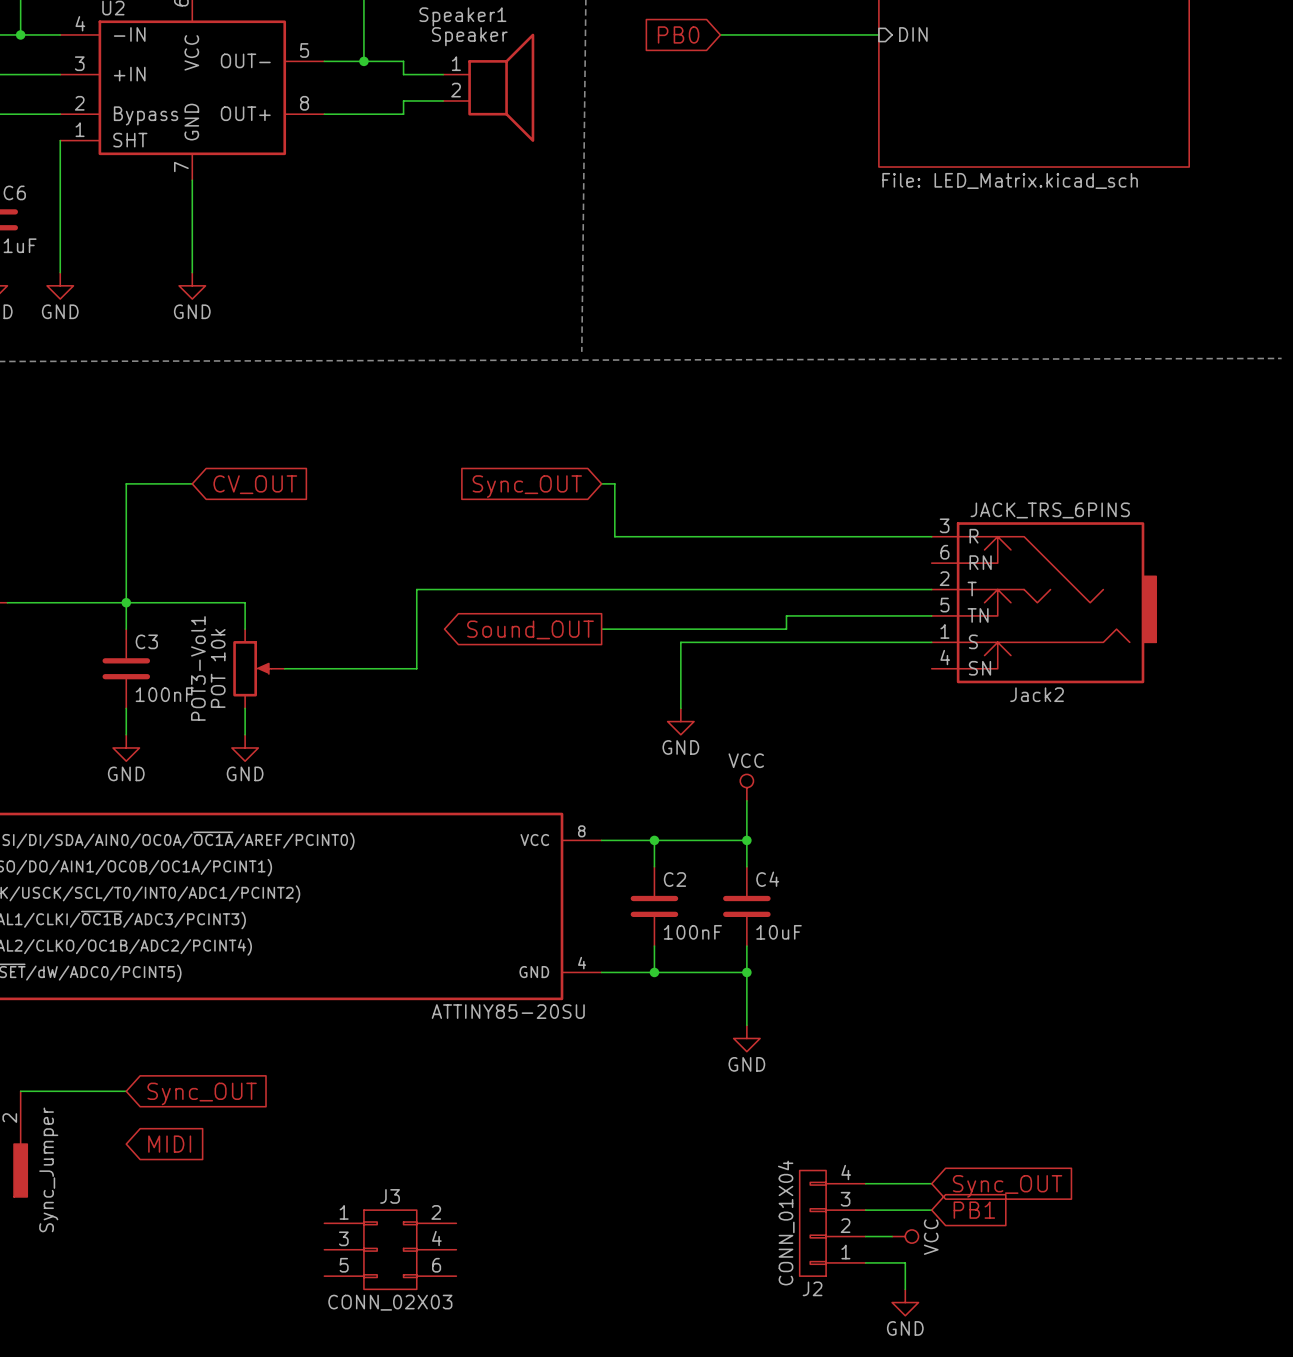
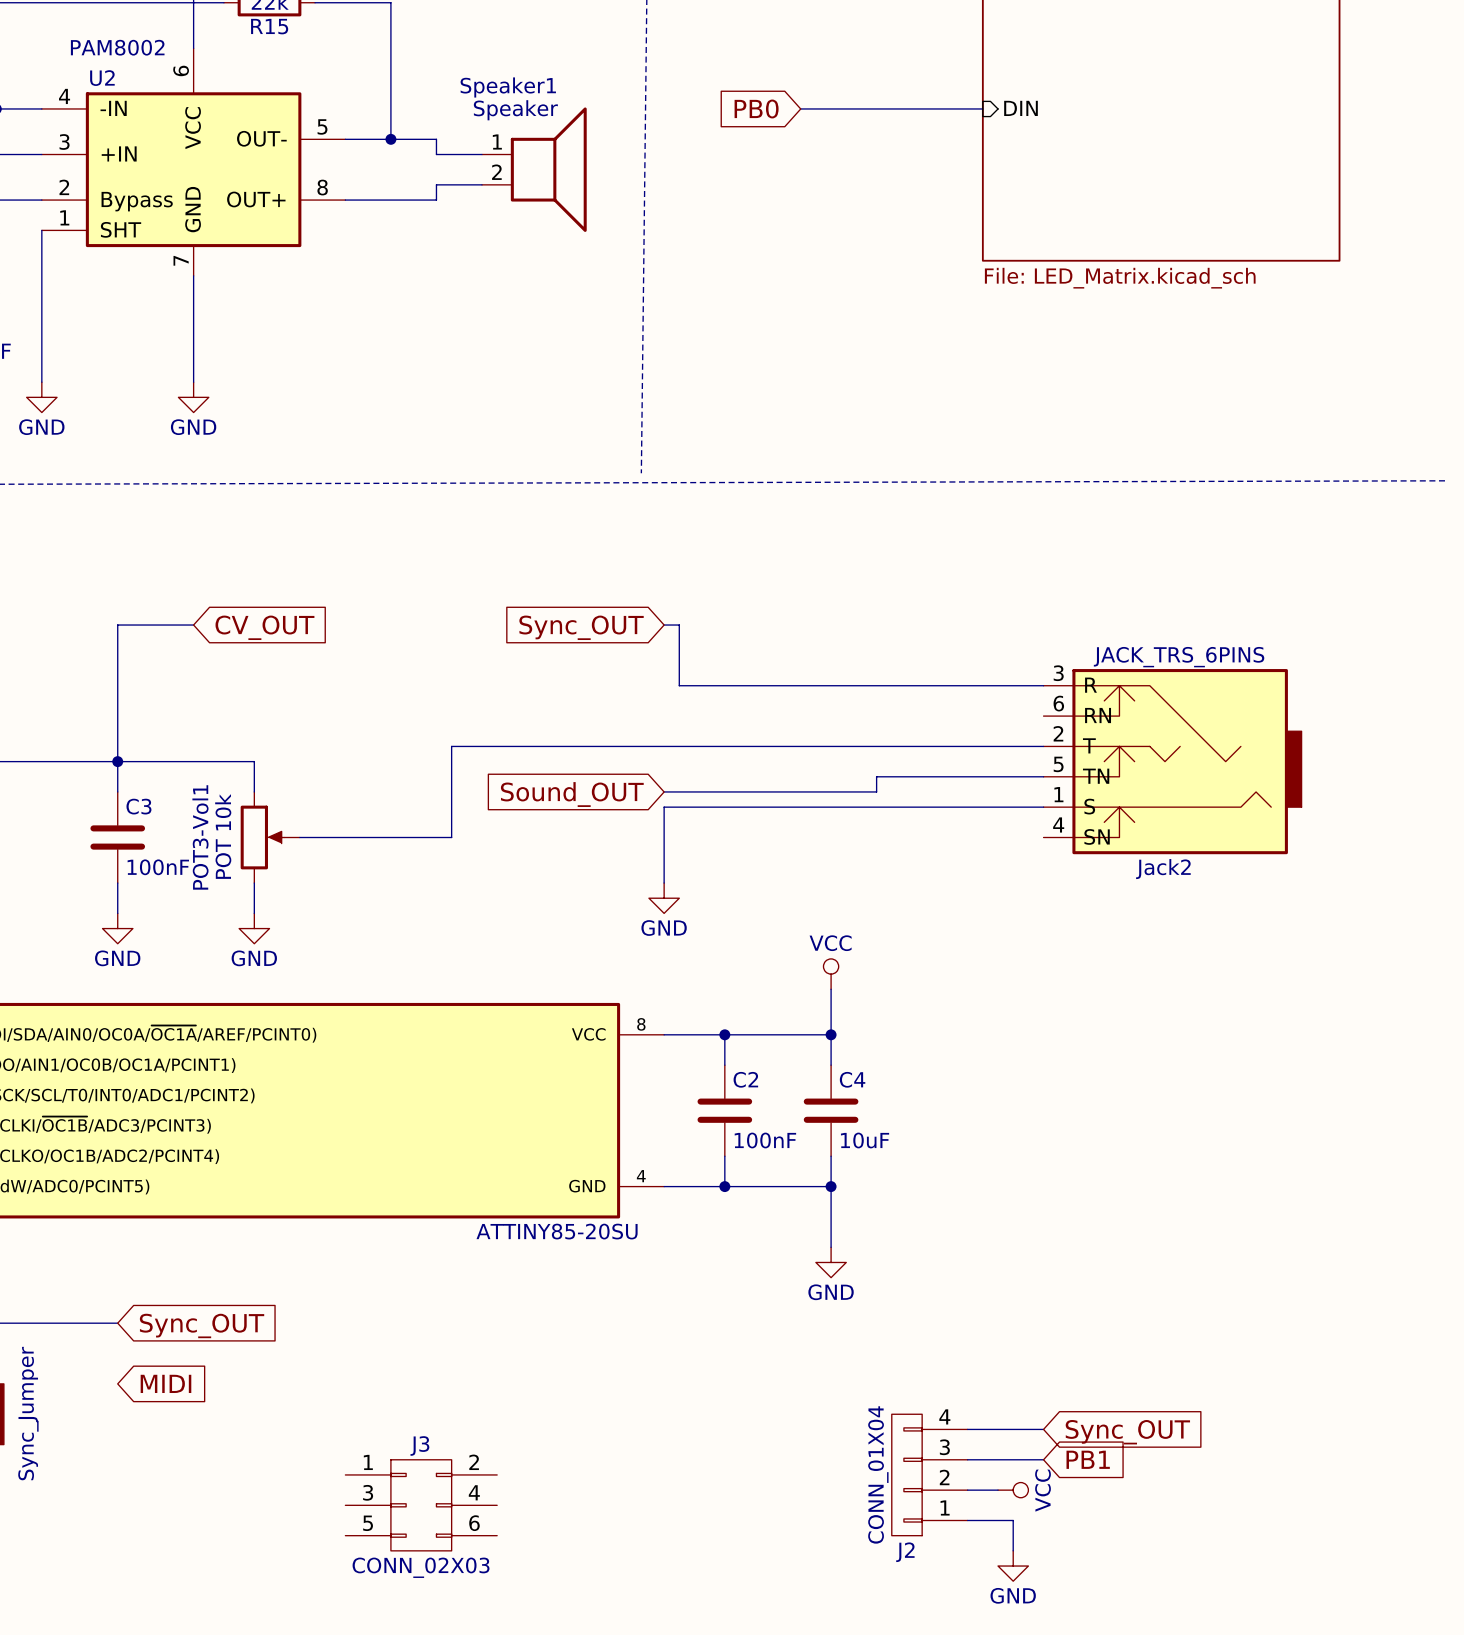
global label shape: output (530, 629) -> input (572, 794)
wire: (680, 642) (680, 708) -> (755, 807) (664, 807) (664, 883)
power symbol position: GND (680, 721) -> GND (664, 898)

